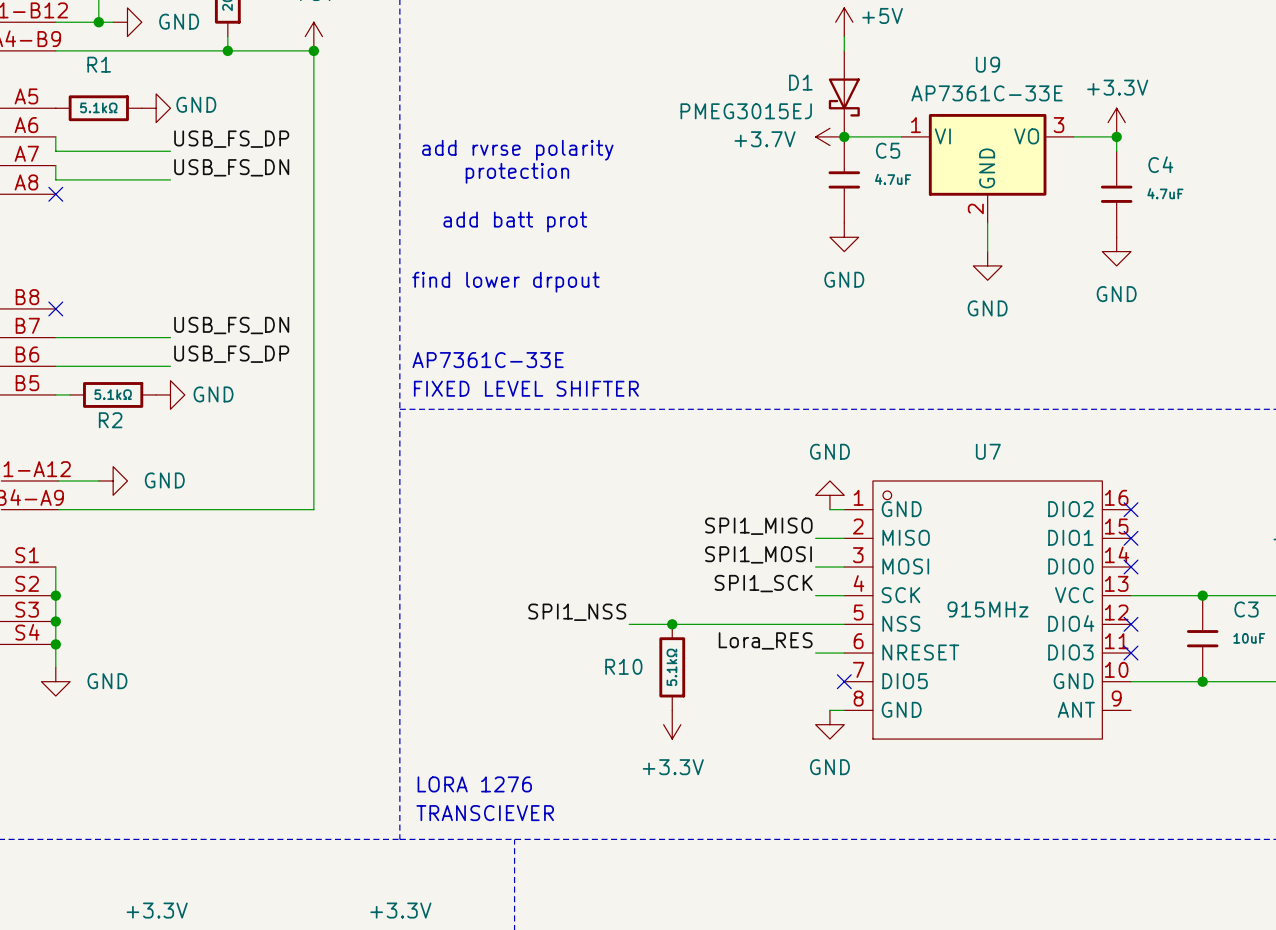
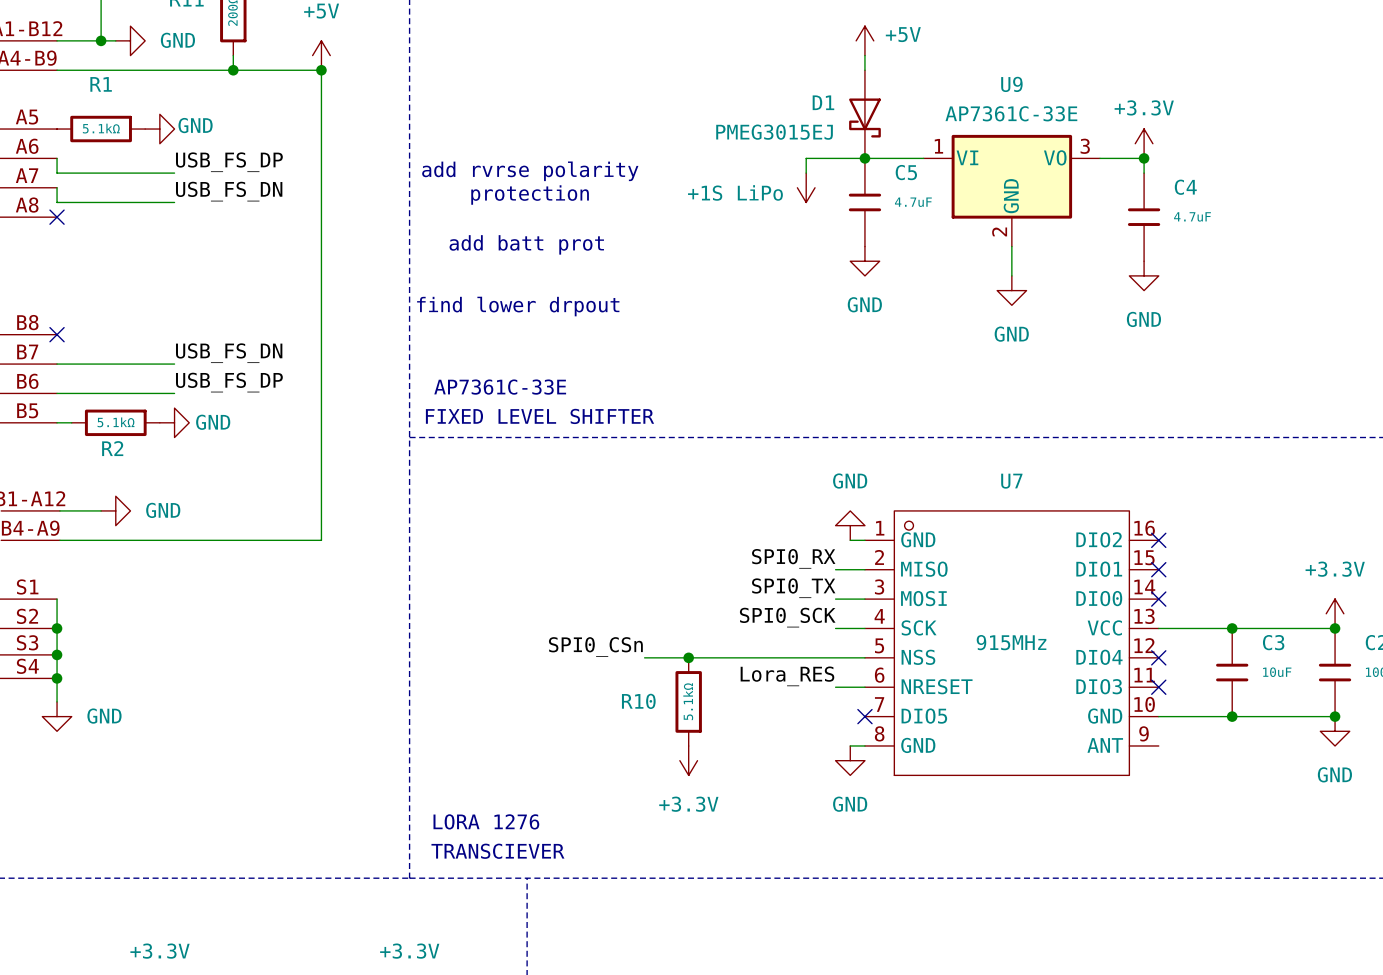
power symbol: +3.7V (829, 136) -> none
wire: none -> (864, 158) (806, 158) (806, 173)
power symbol: none -> +1S LiPo (806, 187)
label: SPI1_MISO (758, 526) -> SPI0_RX (793, 558)
label: SPI1_MOSI (758, 554) -> SPI0_TX (793, 588)
label: SPI1_SCK (763, 583) -> SPI0_SCK (787, 617)
label: SPI1_NSS (577, 612) -> SPI0_CSn (595, 646)

